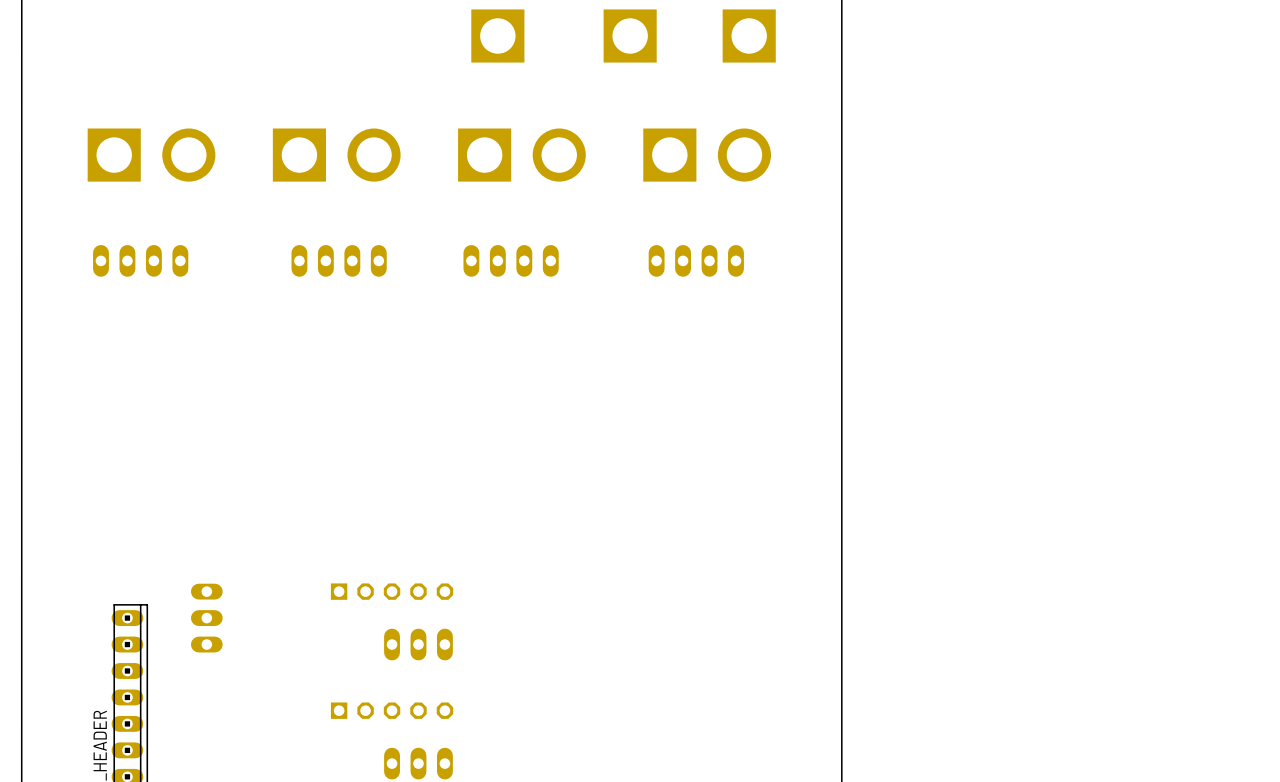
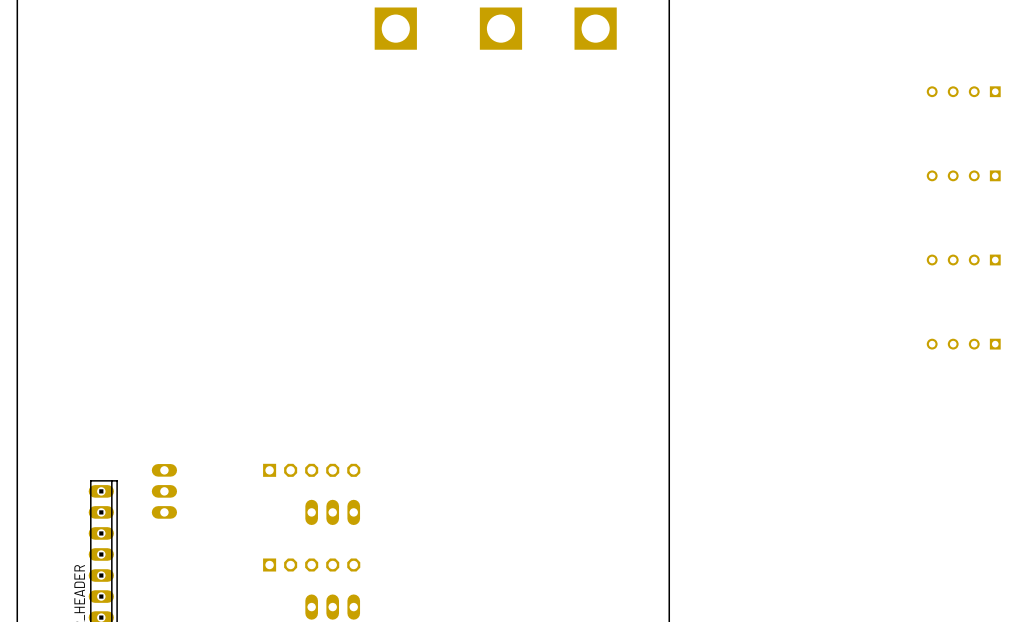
part: none -> (963, 91)
part: (151, 155) -> none
part: (336, 155) -> none
part: (521, 155) -> none
part: (707, 155) -> none
part: none -> (963, 175)
part: (140, 260) -> none
part: (339, 260) -> none
part: (511, 260) -> none
part: (696, 260) -> none
part: none -> (963, 260)
part: none -> (963, 344)

